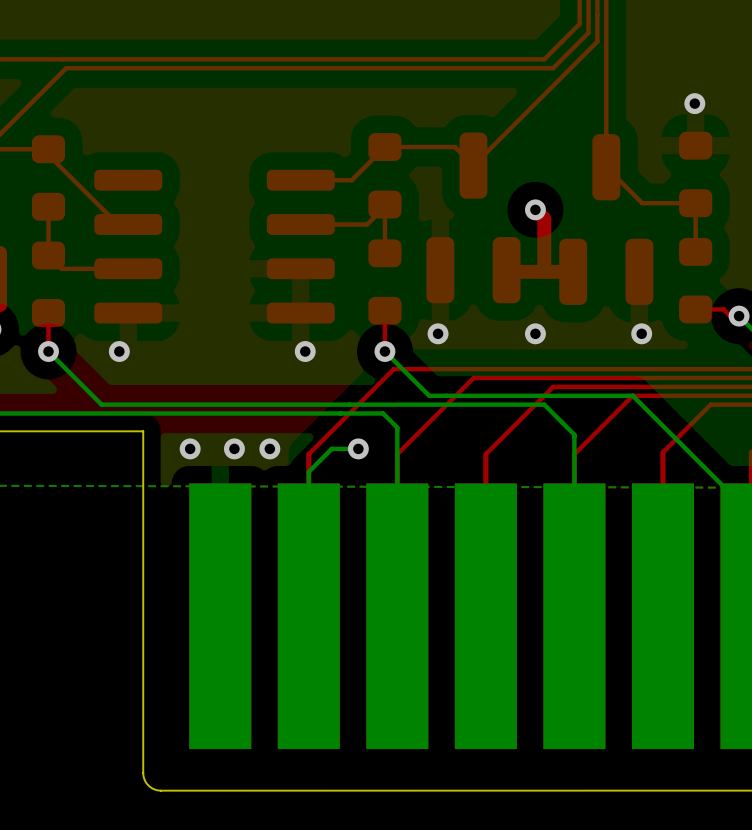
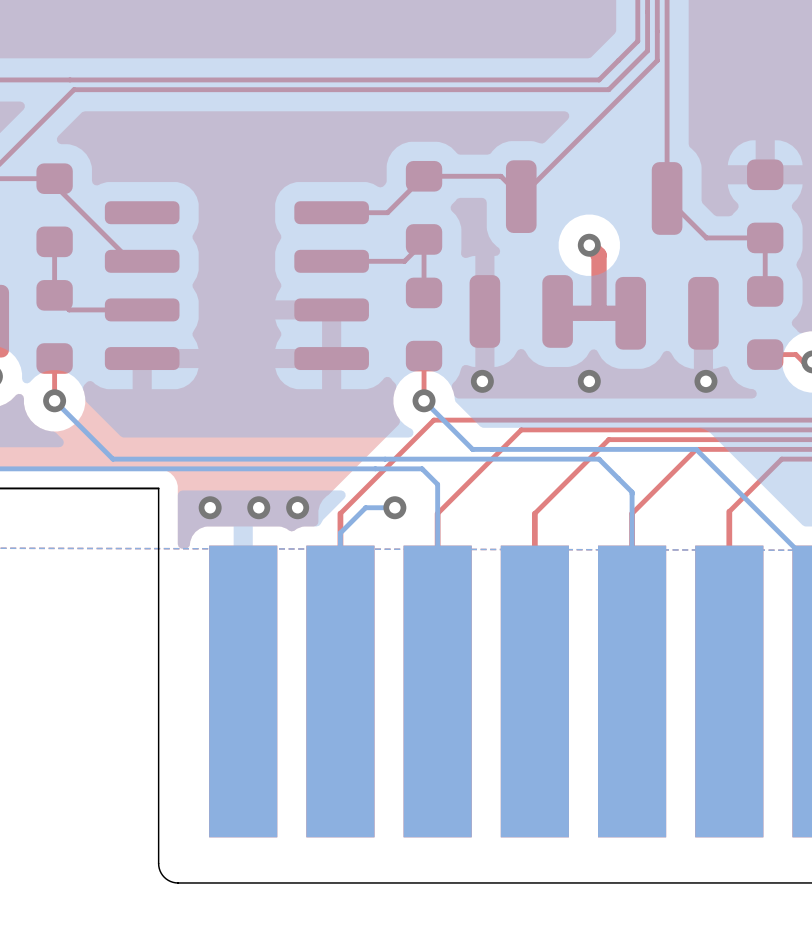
via: (694, 103) -> none
via: (119, 351) -> none
via: (305, 351) -> none

